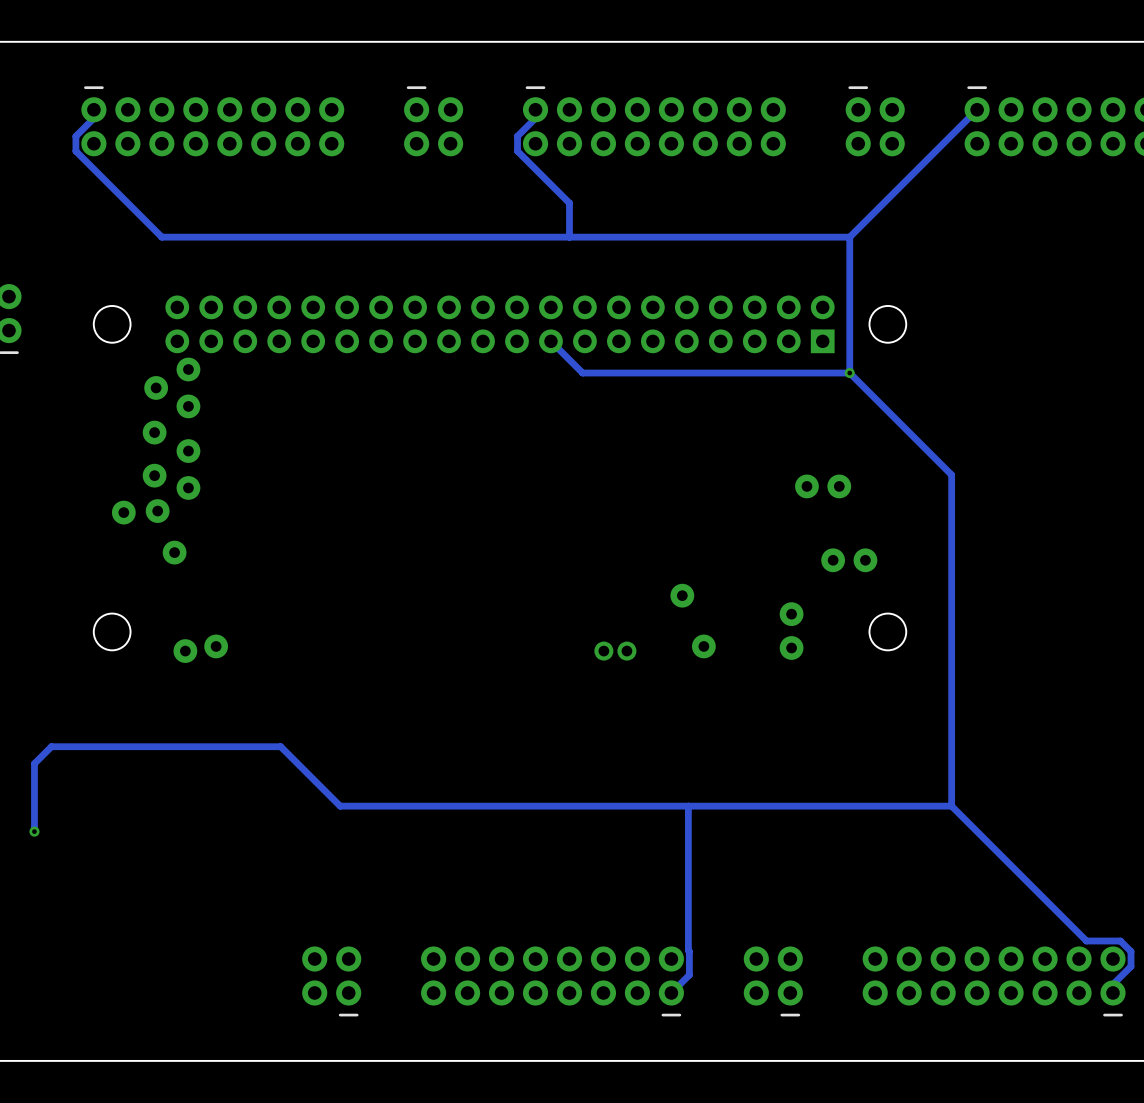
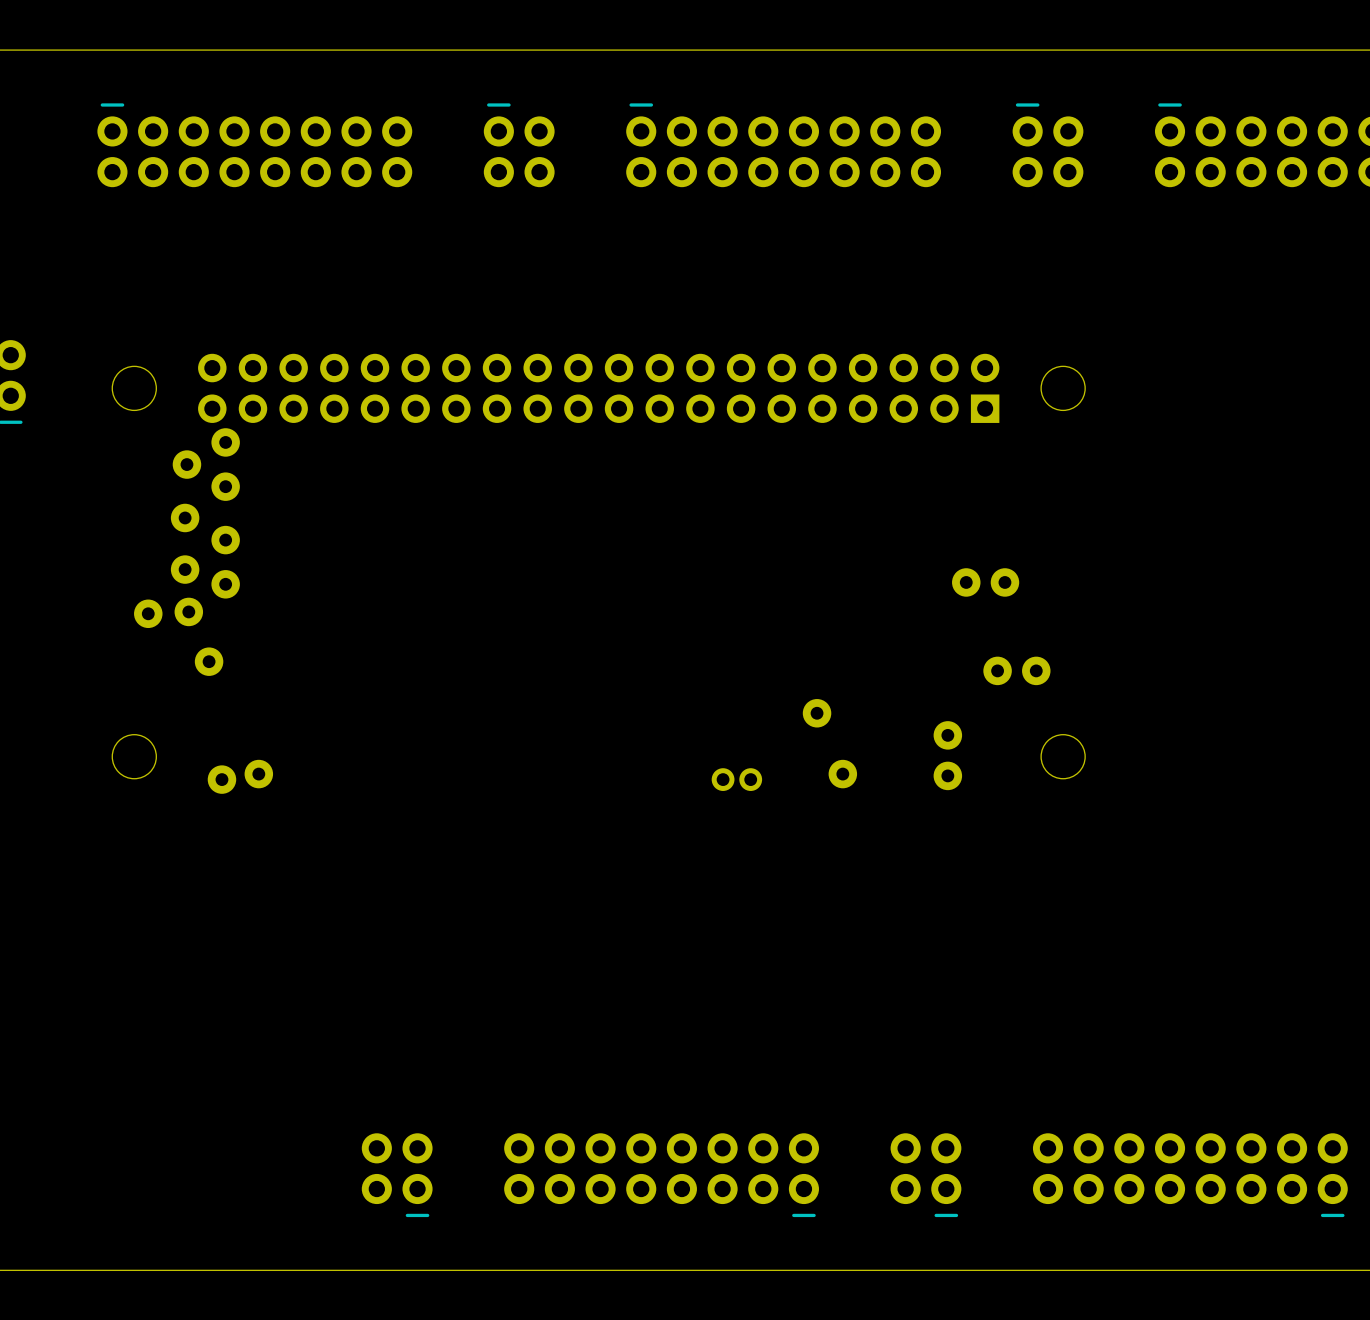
track: (93, 109) (93, 118) (75, 136) (75, 151) (161, 237) (849, 237) -> none
track: (535, 109) (535, 118) (517, 136) (517, 151) (569, 203) (569, 237) -> none
track: (977, 109) (849, 237) -> none
track: (849, 237) (849, 373) -> none
track: (550, 341) (582, 373) (849, 373) -> none
track: (849, 373) (951, 474) (951, 806) -> none
via: (849, 373) -> none
track: (688, 806) (689, 974) (671, 992) -> none
track: (951, 806) (1086, 941) (1120, 941) (1131, 951) (1131, 966) (1113, 984) (1113, 992) -> none
track: (951, 806) (340, 806) (280, 746) (51, 746) (34, 763) (34, 831) -> none
via: (34, 831) -> none

